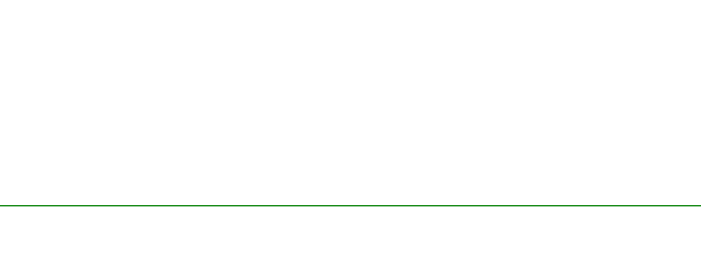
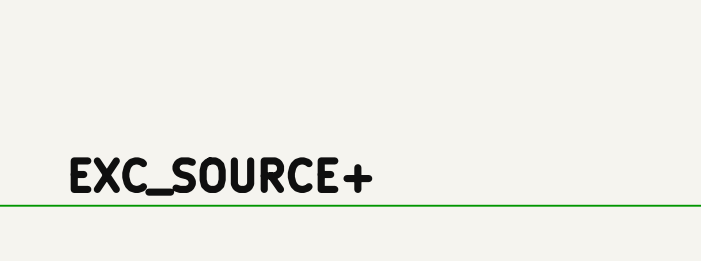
label: none -> EXC_SOURCE+ (221, 176)

